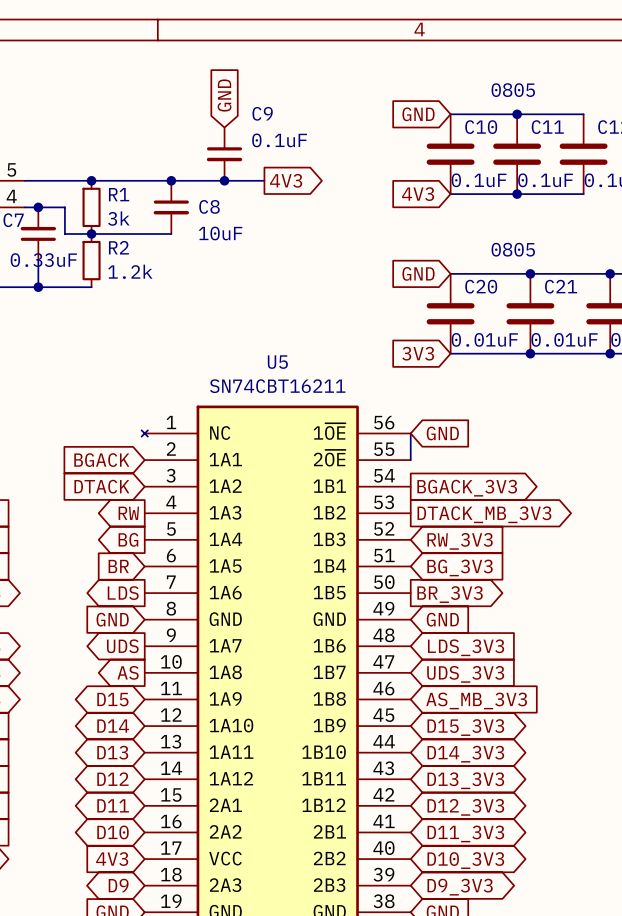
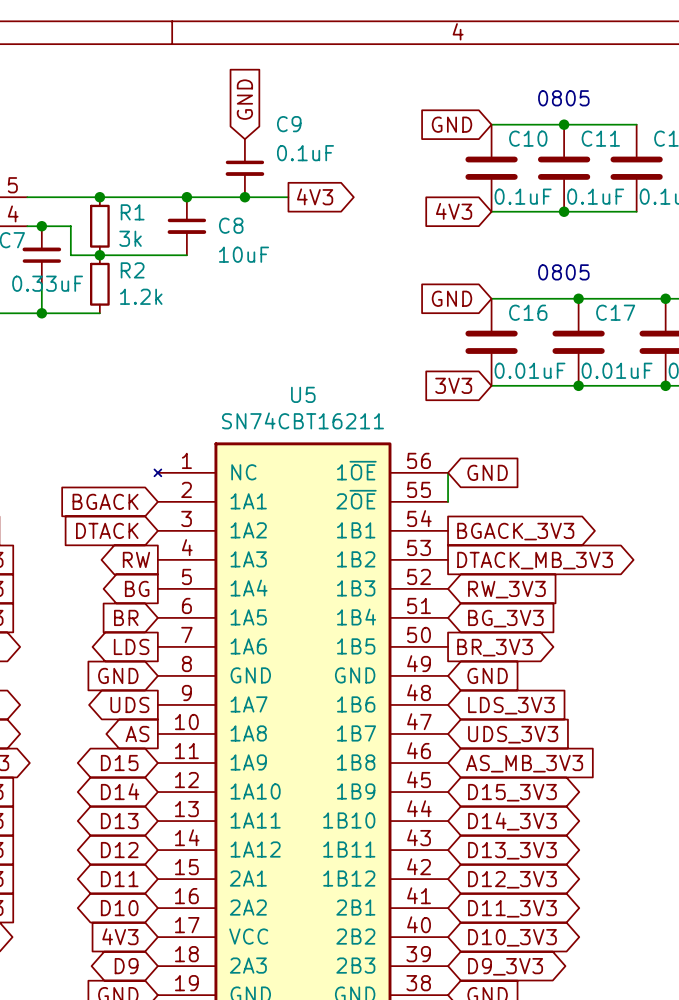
C20 name: C20 (481, 286) -> C16 (528, 312)
C21 name: C21 (561, 286) -> C17 (615, 312)

